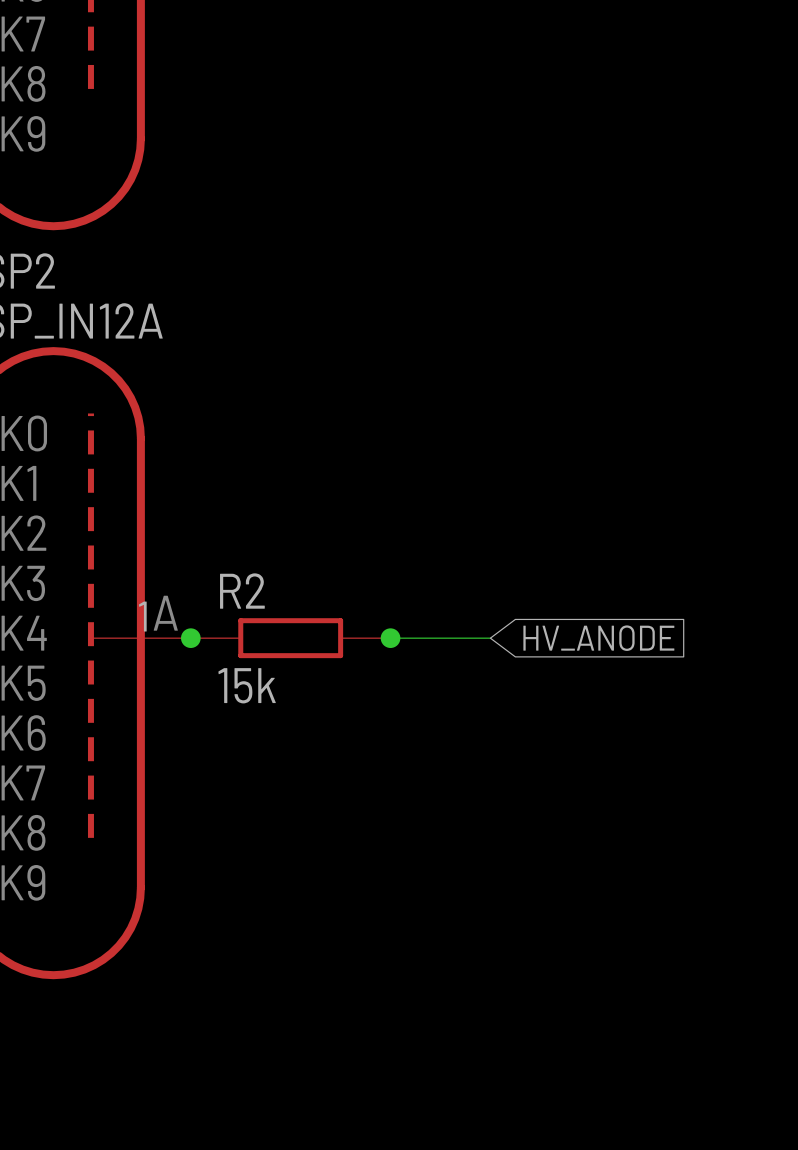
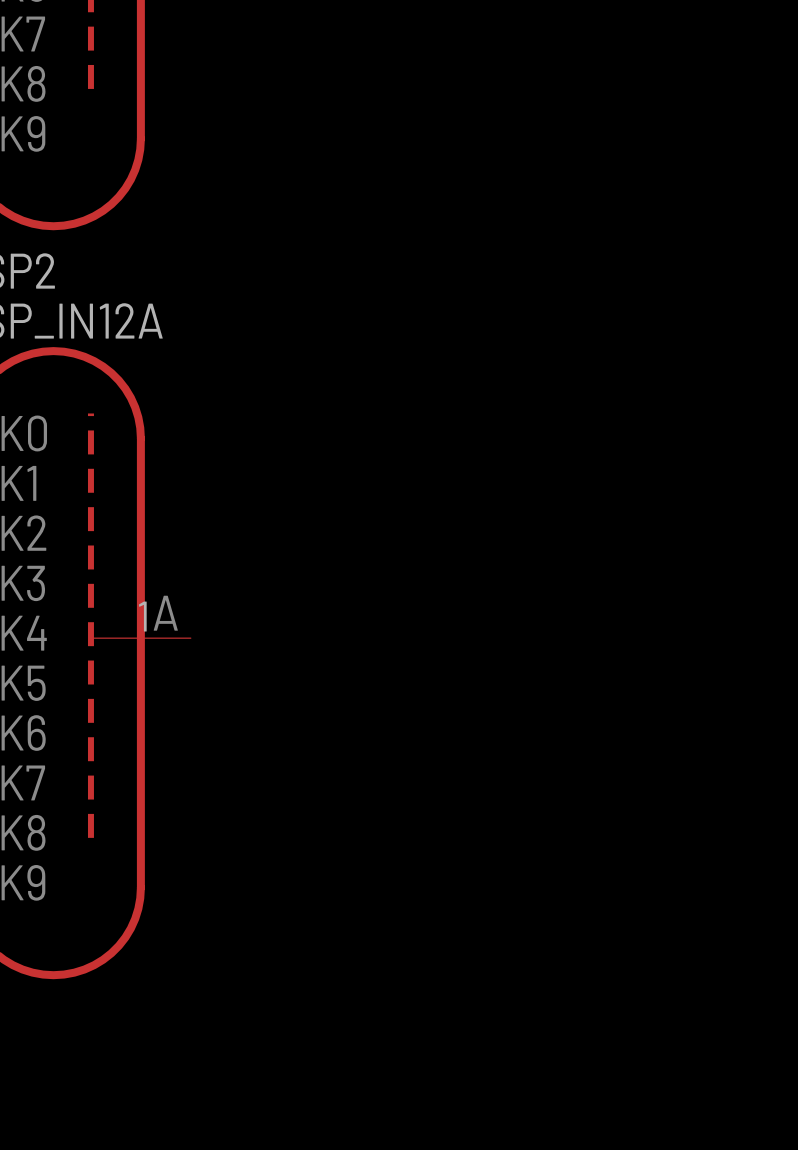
junction: (190, 638) -> none
R2: 15k (290, 638) -> none
wire: (390, 638) (490, 638) -> none
junction: (390, 638) -> none
global label: HV_ANODE (598, 638) -> none

